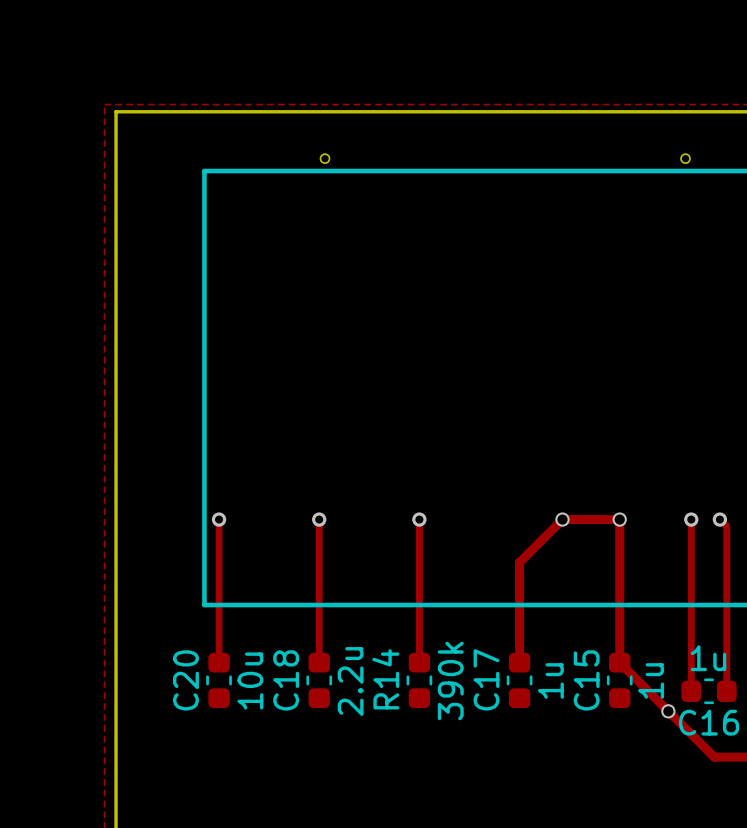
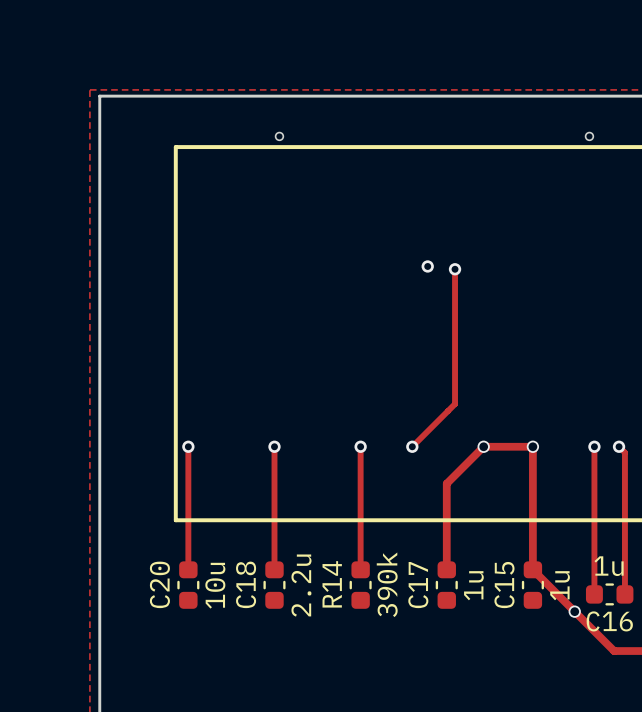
via: none -> (427, 266)
track: none -> (455, 269) (455, 404) (412, 446)
via: none -> (455, 269)
via: none -> (412, 446)

